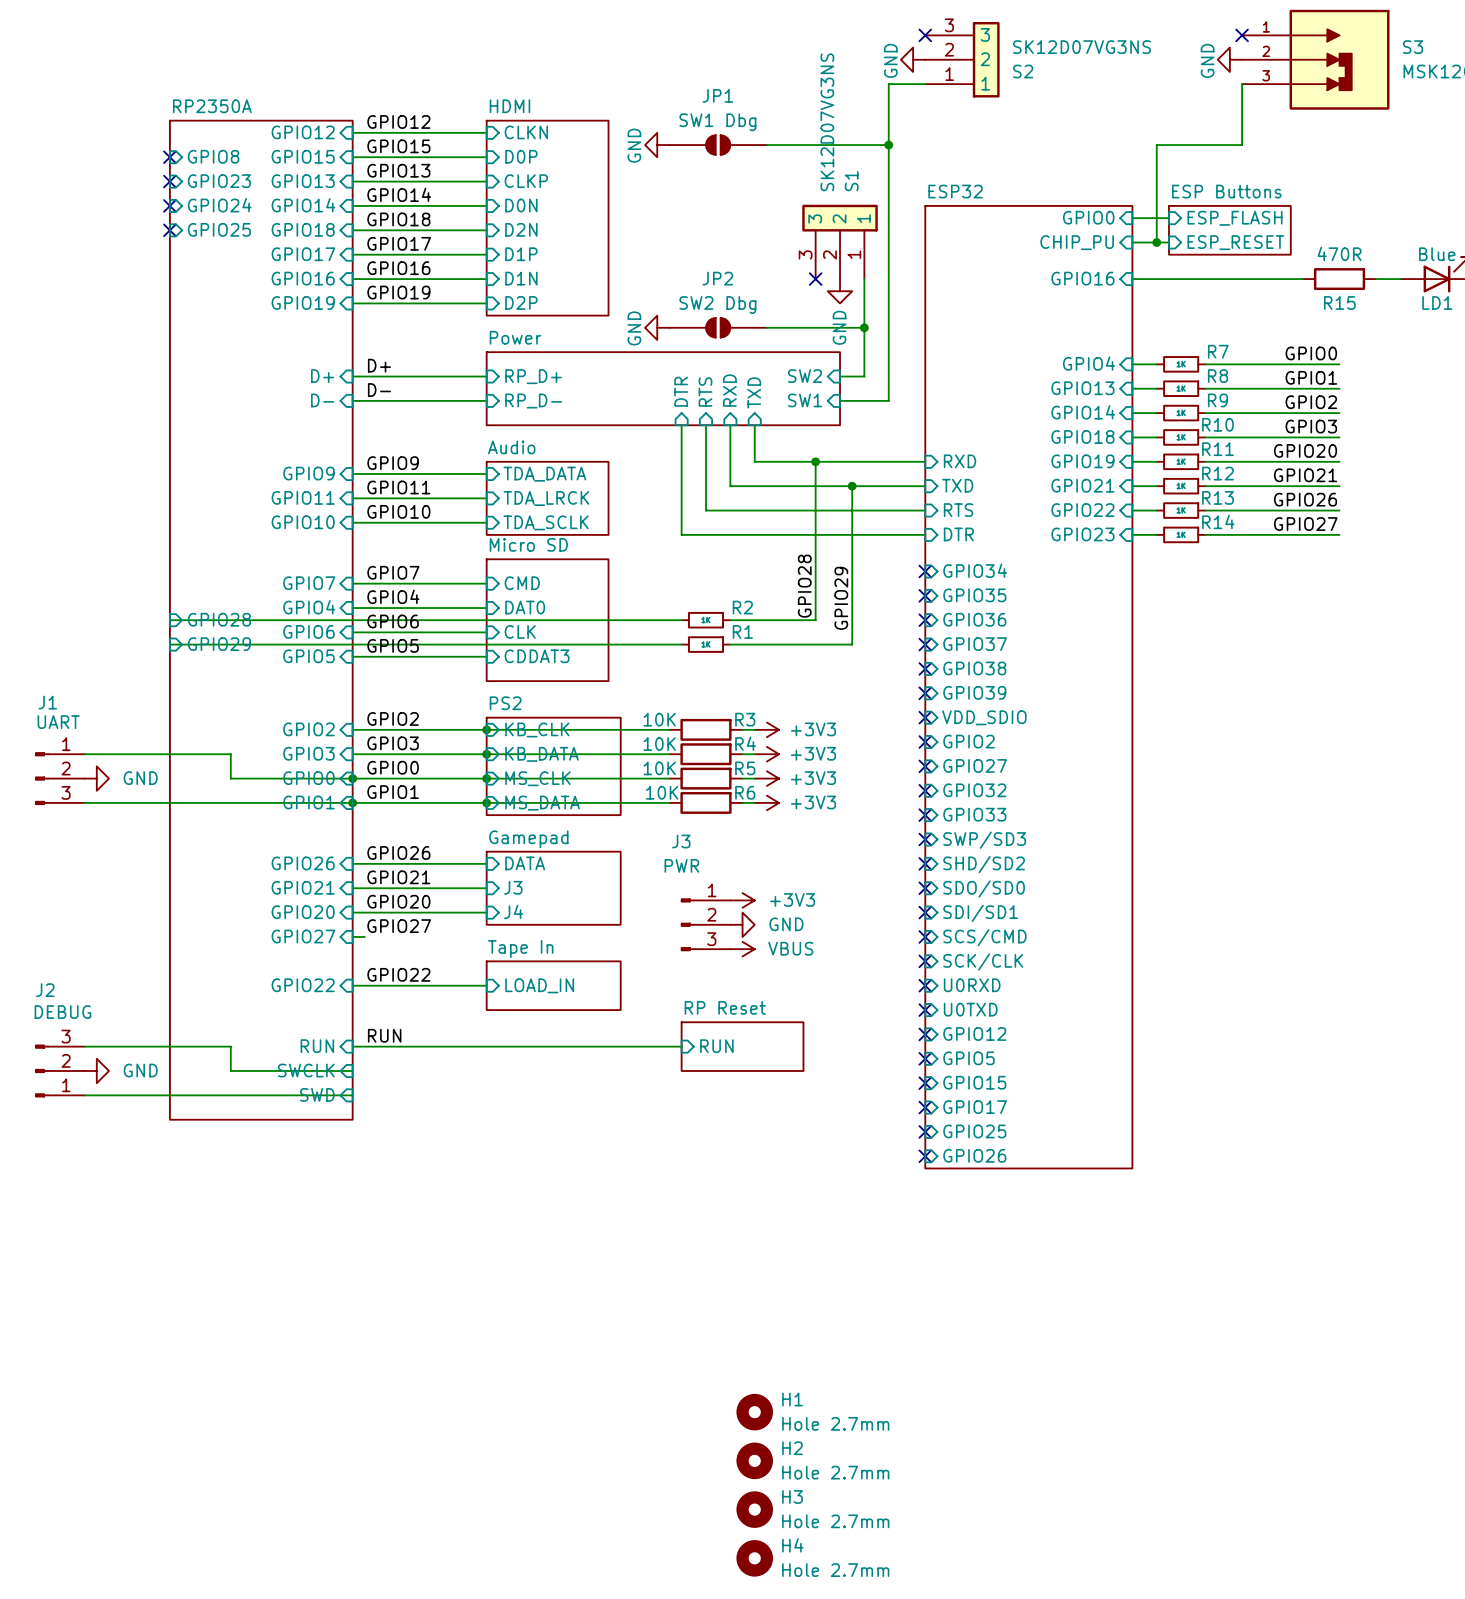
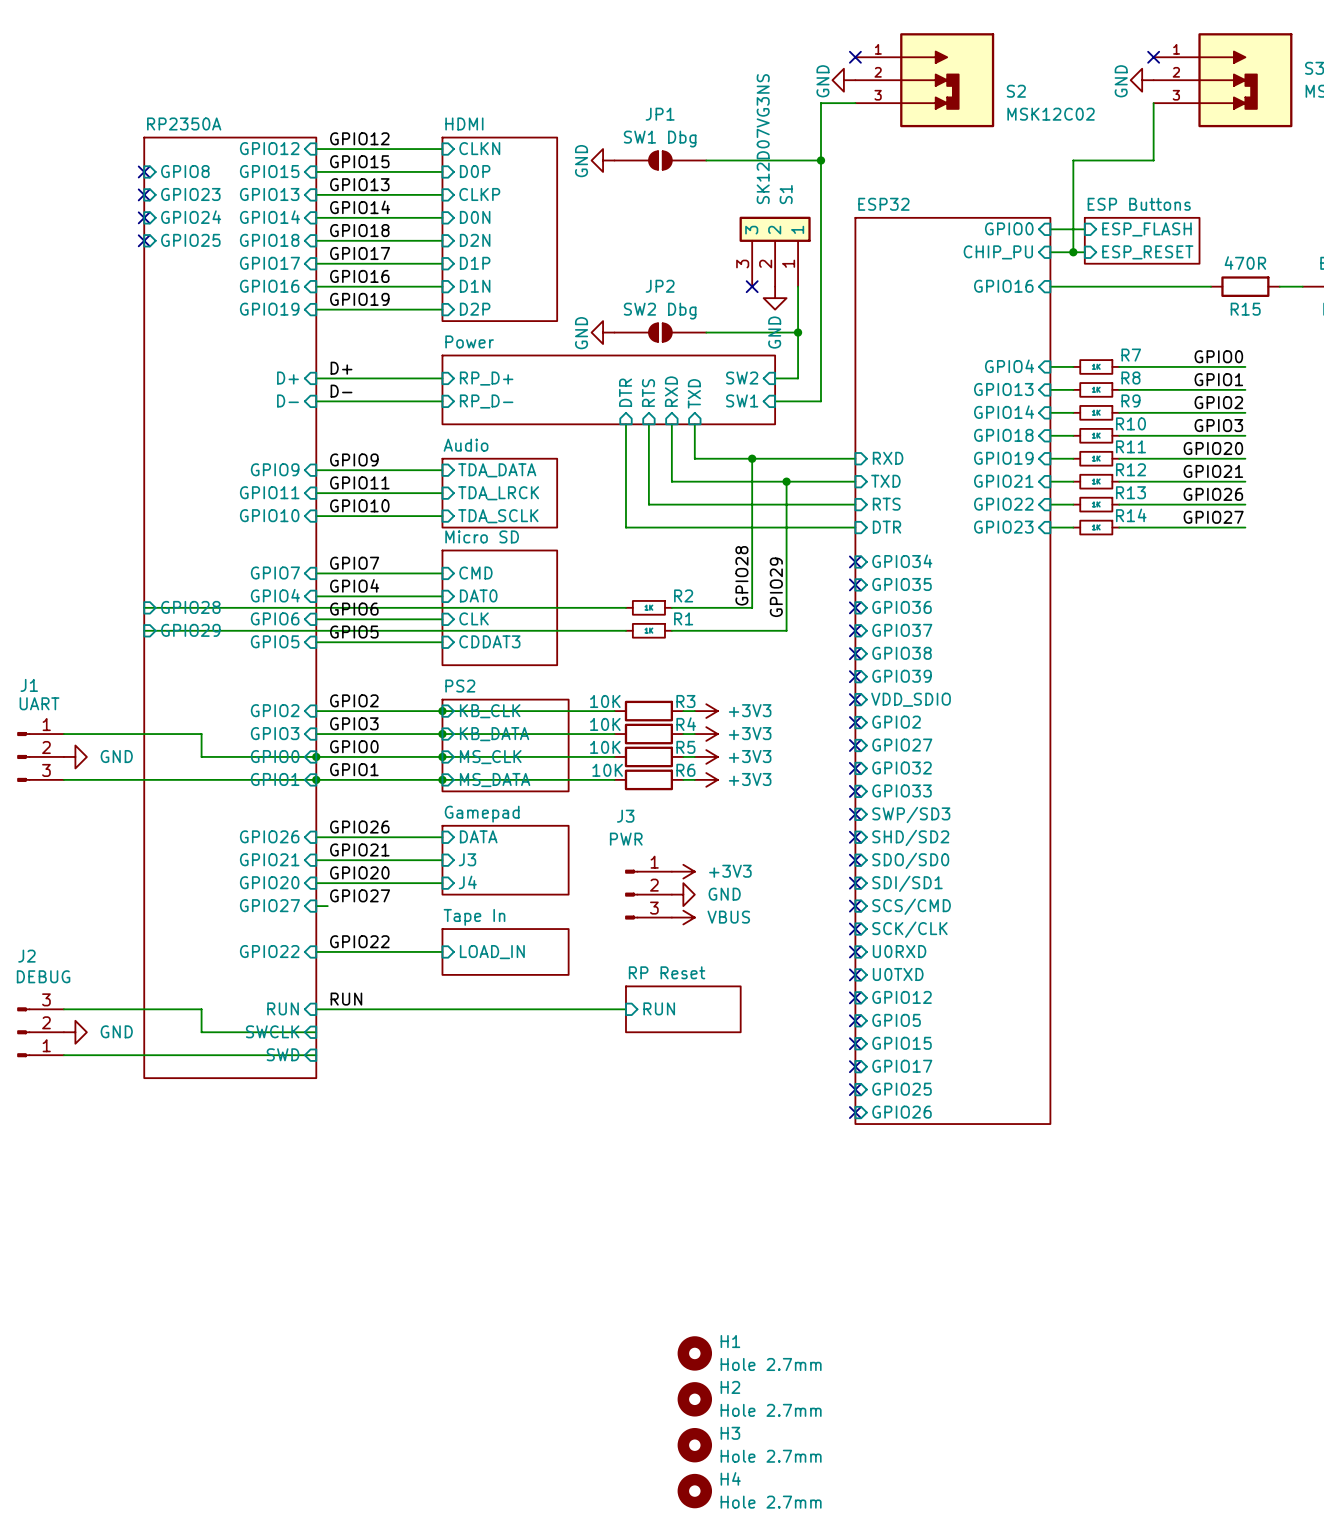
S2 symbol: [925, 21, 1000, 98] -> [855, 33, 995, 128]
S2 value: SK12D07VG3NS (1082, 47) -> MSK12C02 (1051, 114)
S2 name position: S2 (1023, 71) -> S2 (1016, 91)

